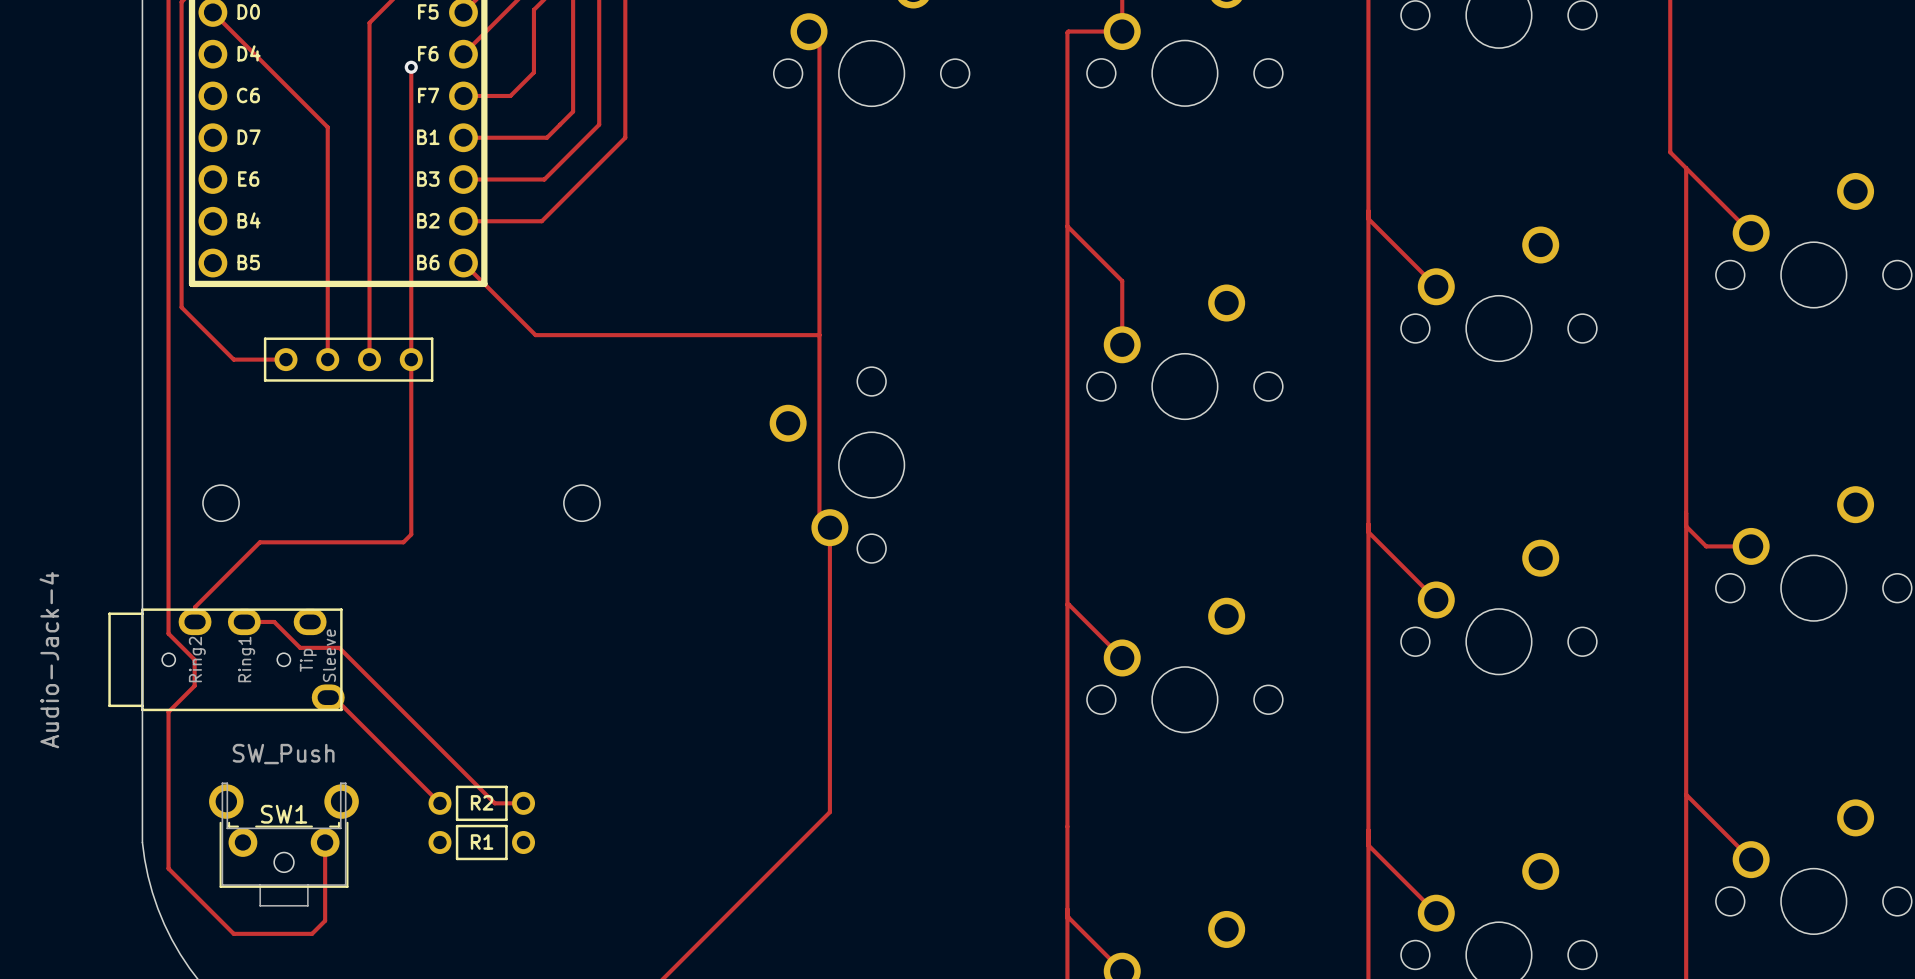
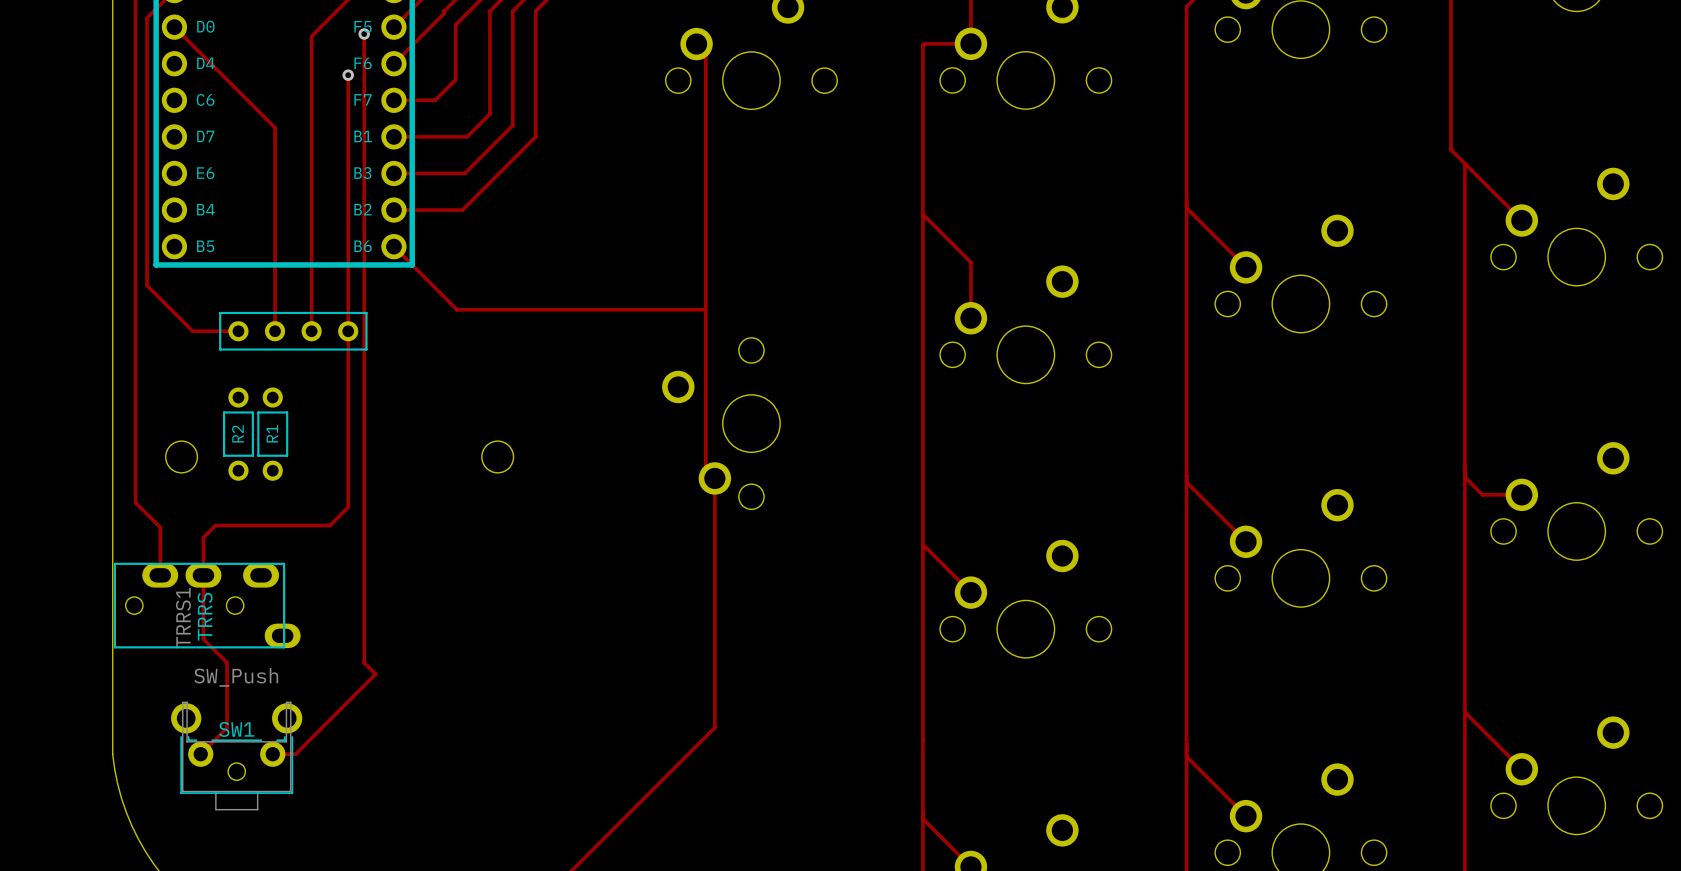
via: none -> (364, 34)
track: (411, 534) (403, 542) (259, 542) (195, 607) (195, 621) -> (348, 484) (348, 507) (329, 525) (215, 525) (203, 537) (203, 639) (227, 662) (227, 727) (200, 754)
track: (168, 555) (168, 633) (194, 659) (194, 685) (168, 711) (168, 868) (233, 933) (312, 933) (325, 920) (325, 842) -> (135, 502) (160, 527) (160, 575)
track: (244, 621) (274, 621) (300, 647) (339, 647) (429, 738) -> (364, 34) (364, 662)
part: Audio-Jack-4 (226, 659) -> none
TRRS1: none -> (207, 605)
track: (328, 697) (334, 697) (439, 803) -> none
track: (442, 751) (494, 803) (523, 803) -> (375, 674) (295, 754) (272, 754)
R2 rotation: 0° (481, 803) -> 90° clockwise (238, 434)
R2 position: (481, 803) -> (238, 434)
R1 rotation: 0° (481, 842) -> 90° clockwise (272, 434)
R1 position: (481, 842) -> (272, 434)

